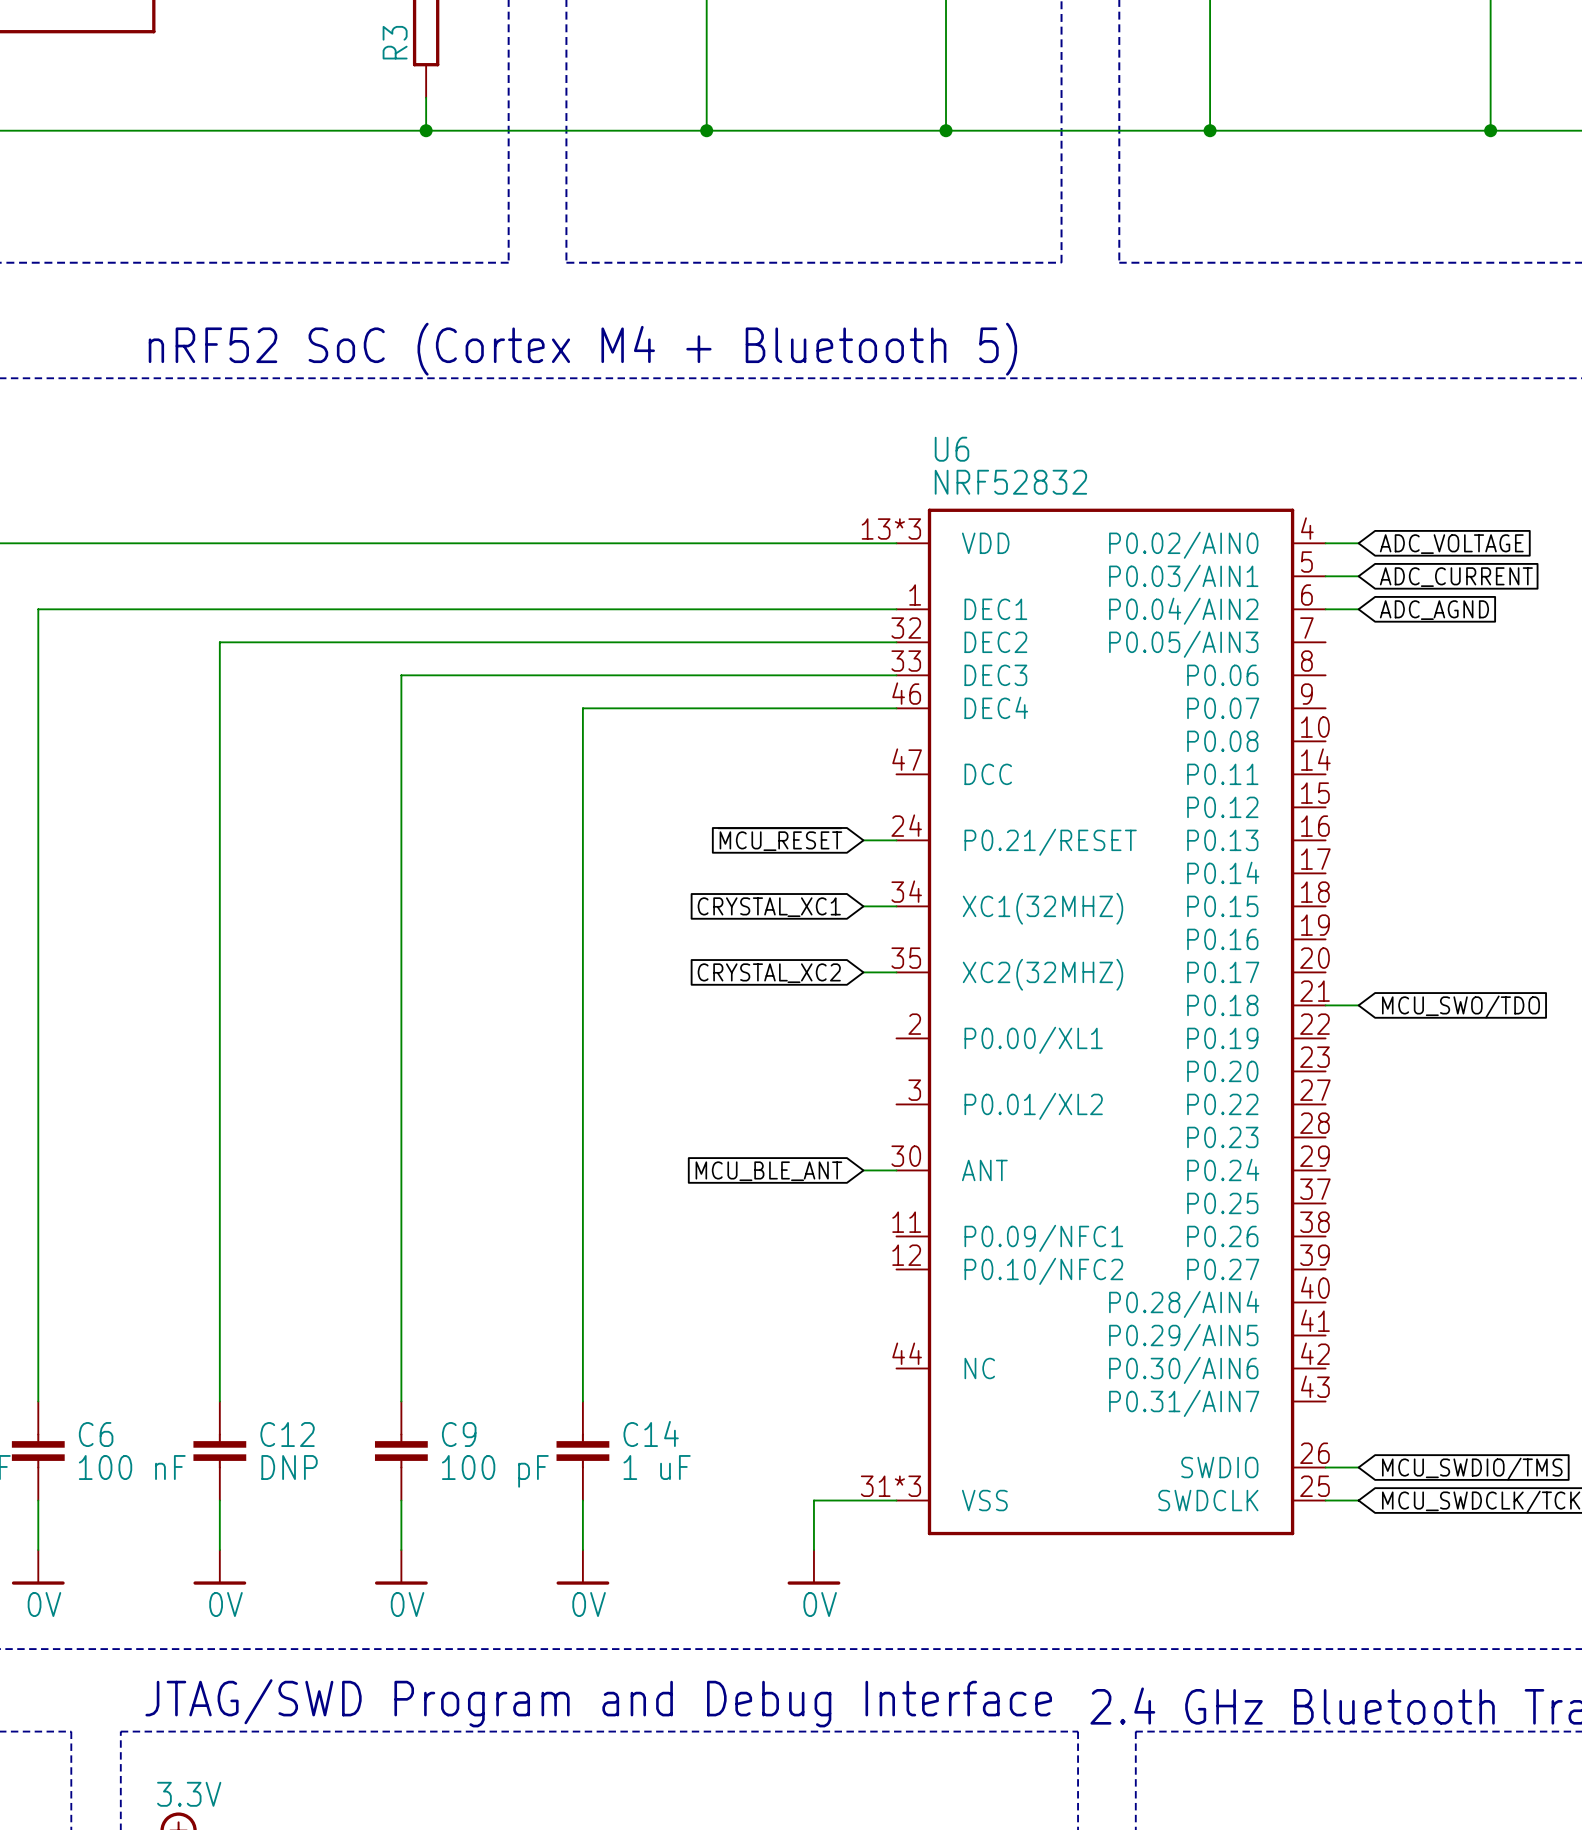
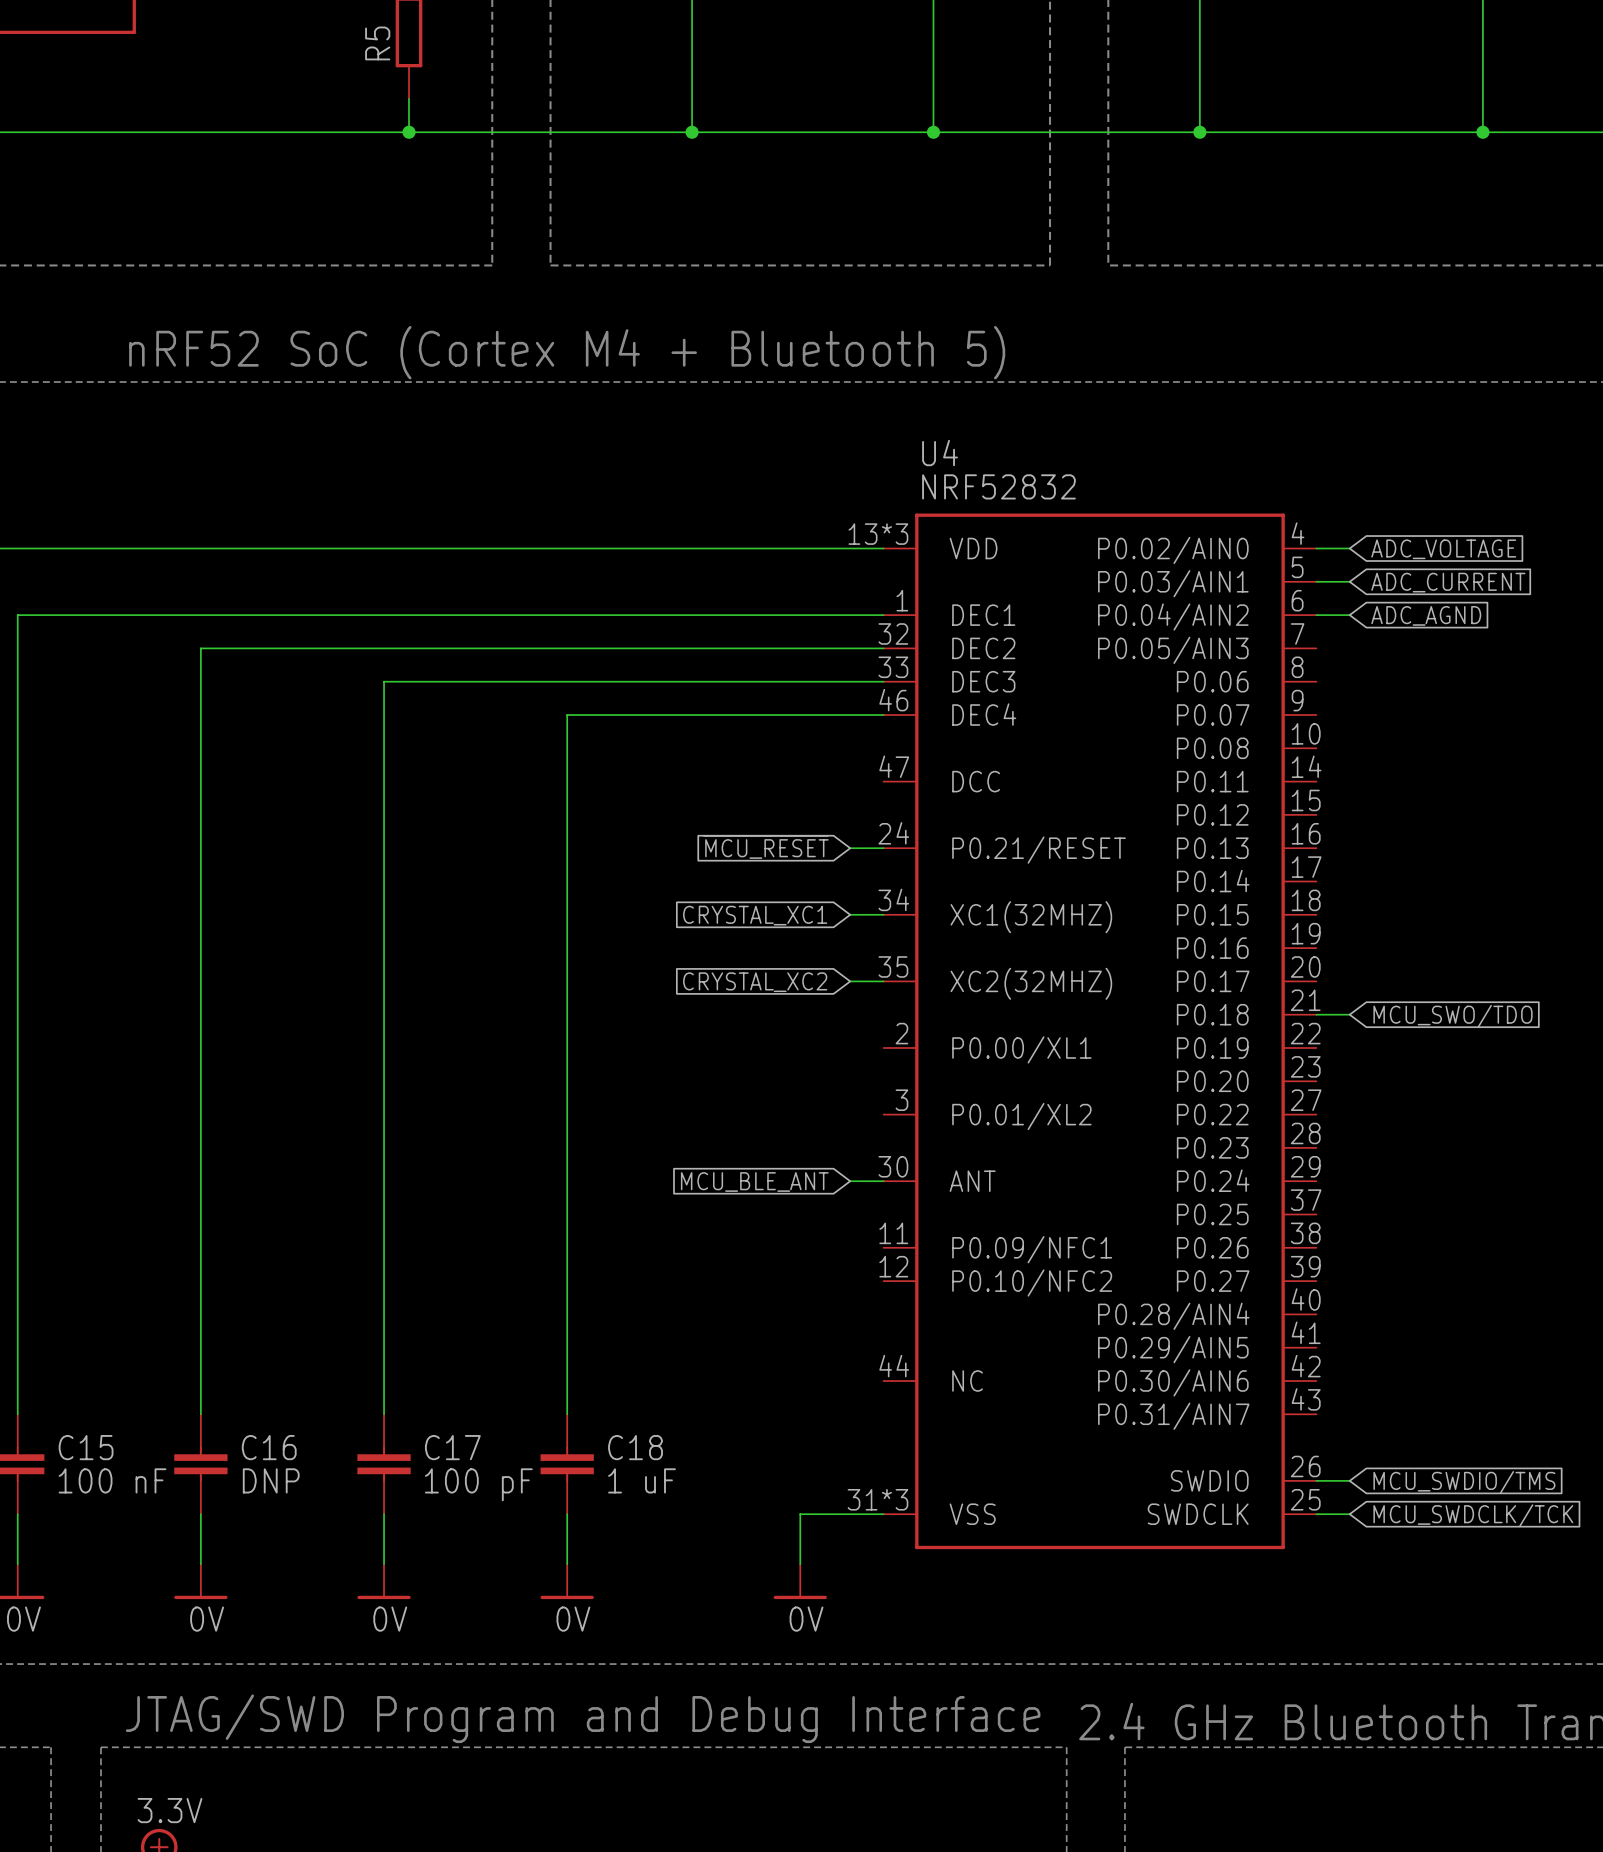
R3 name: R3 (395, 42) -> R5 (377, 43)
U6 name: U6 (952, 449) -> U4 (940, 453)
C14 name: C14 (651, 1433) -> C18 (635, 1447)
C6 name: C6 (96, 1434) -> C15 (86, 1447)
C12 name: C12 (287, 1434) -> C16 (269, 1447)
C9 name: C9 (459, 1434) -> C17 (452, 1447)

